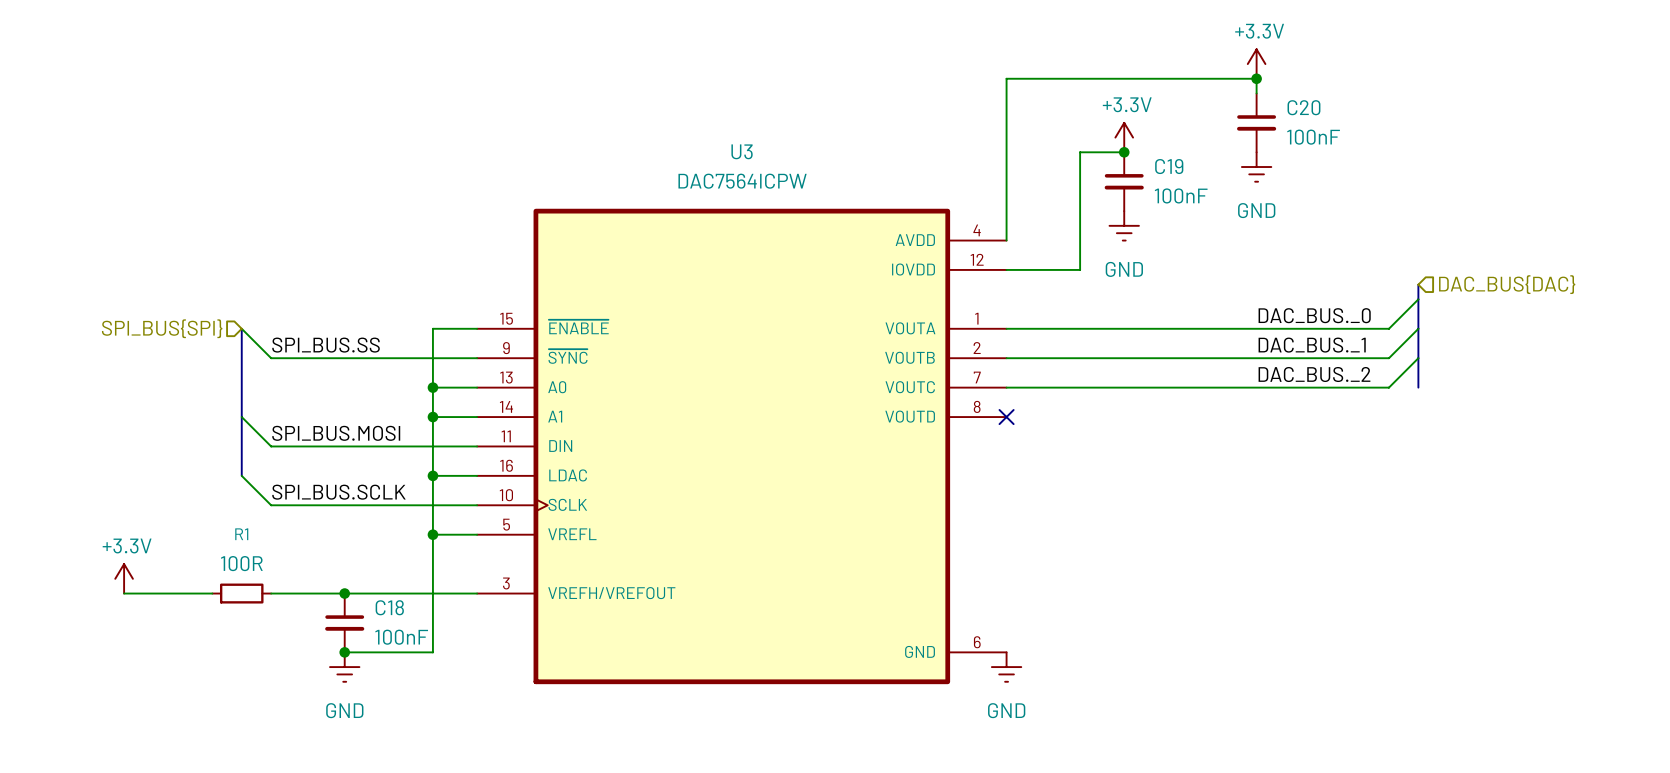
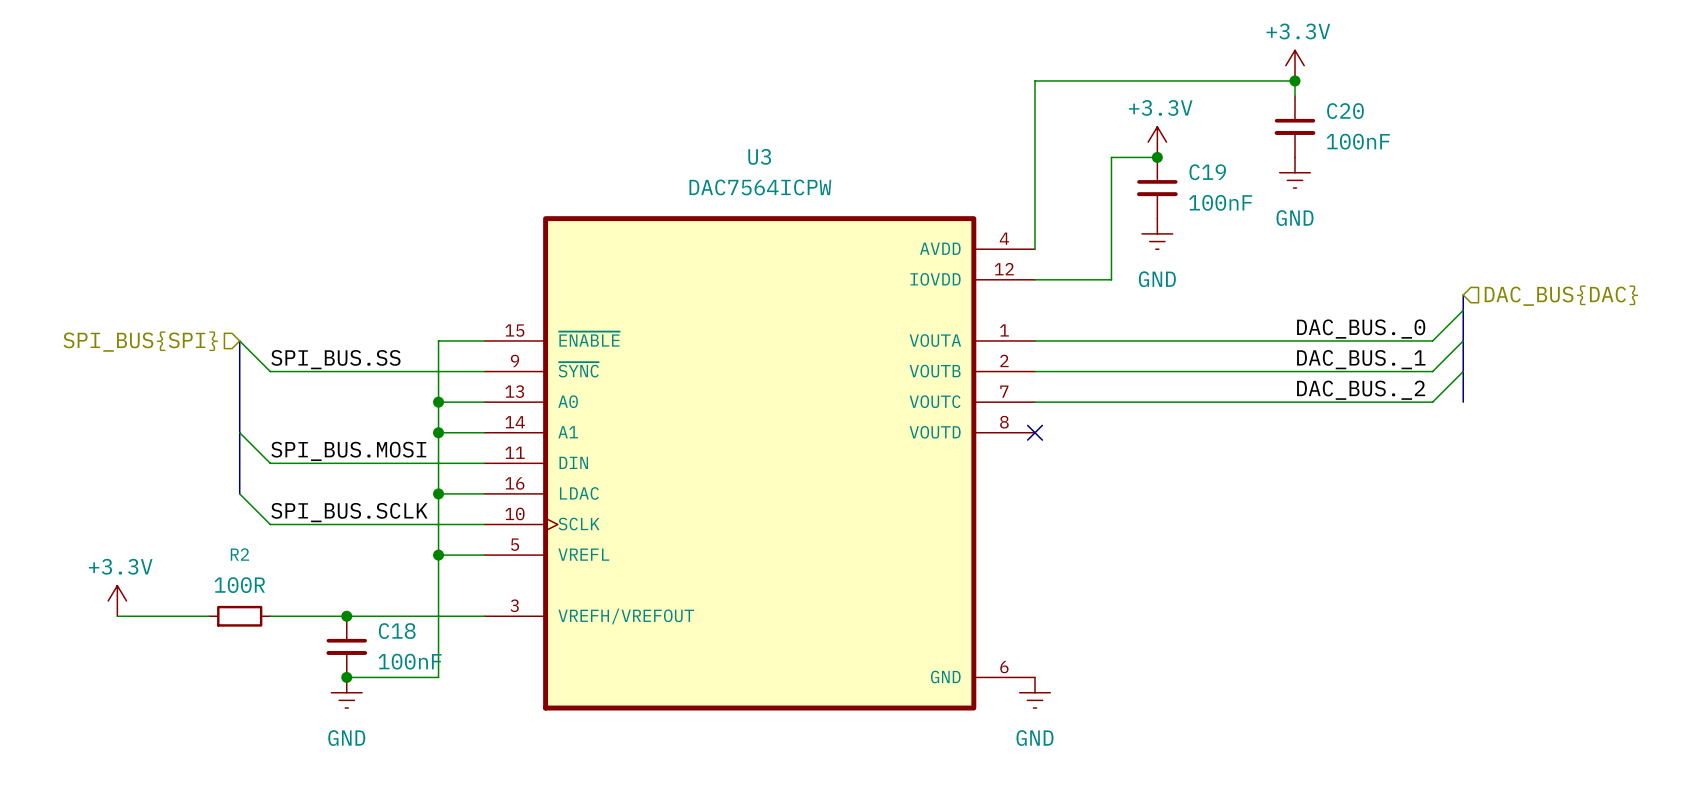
R1 name: R1 (241, 534) -> R2 (239, 554)

